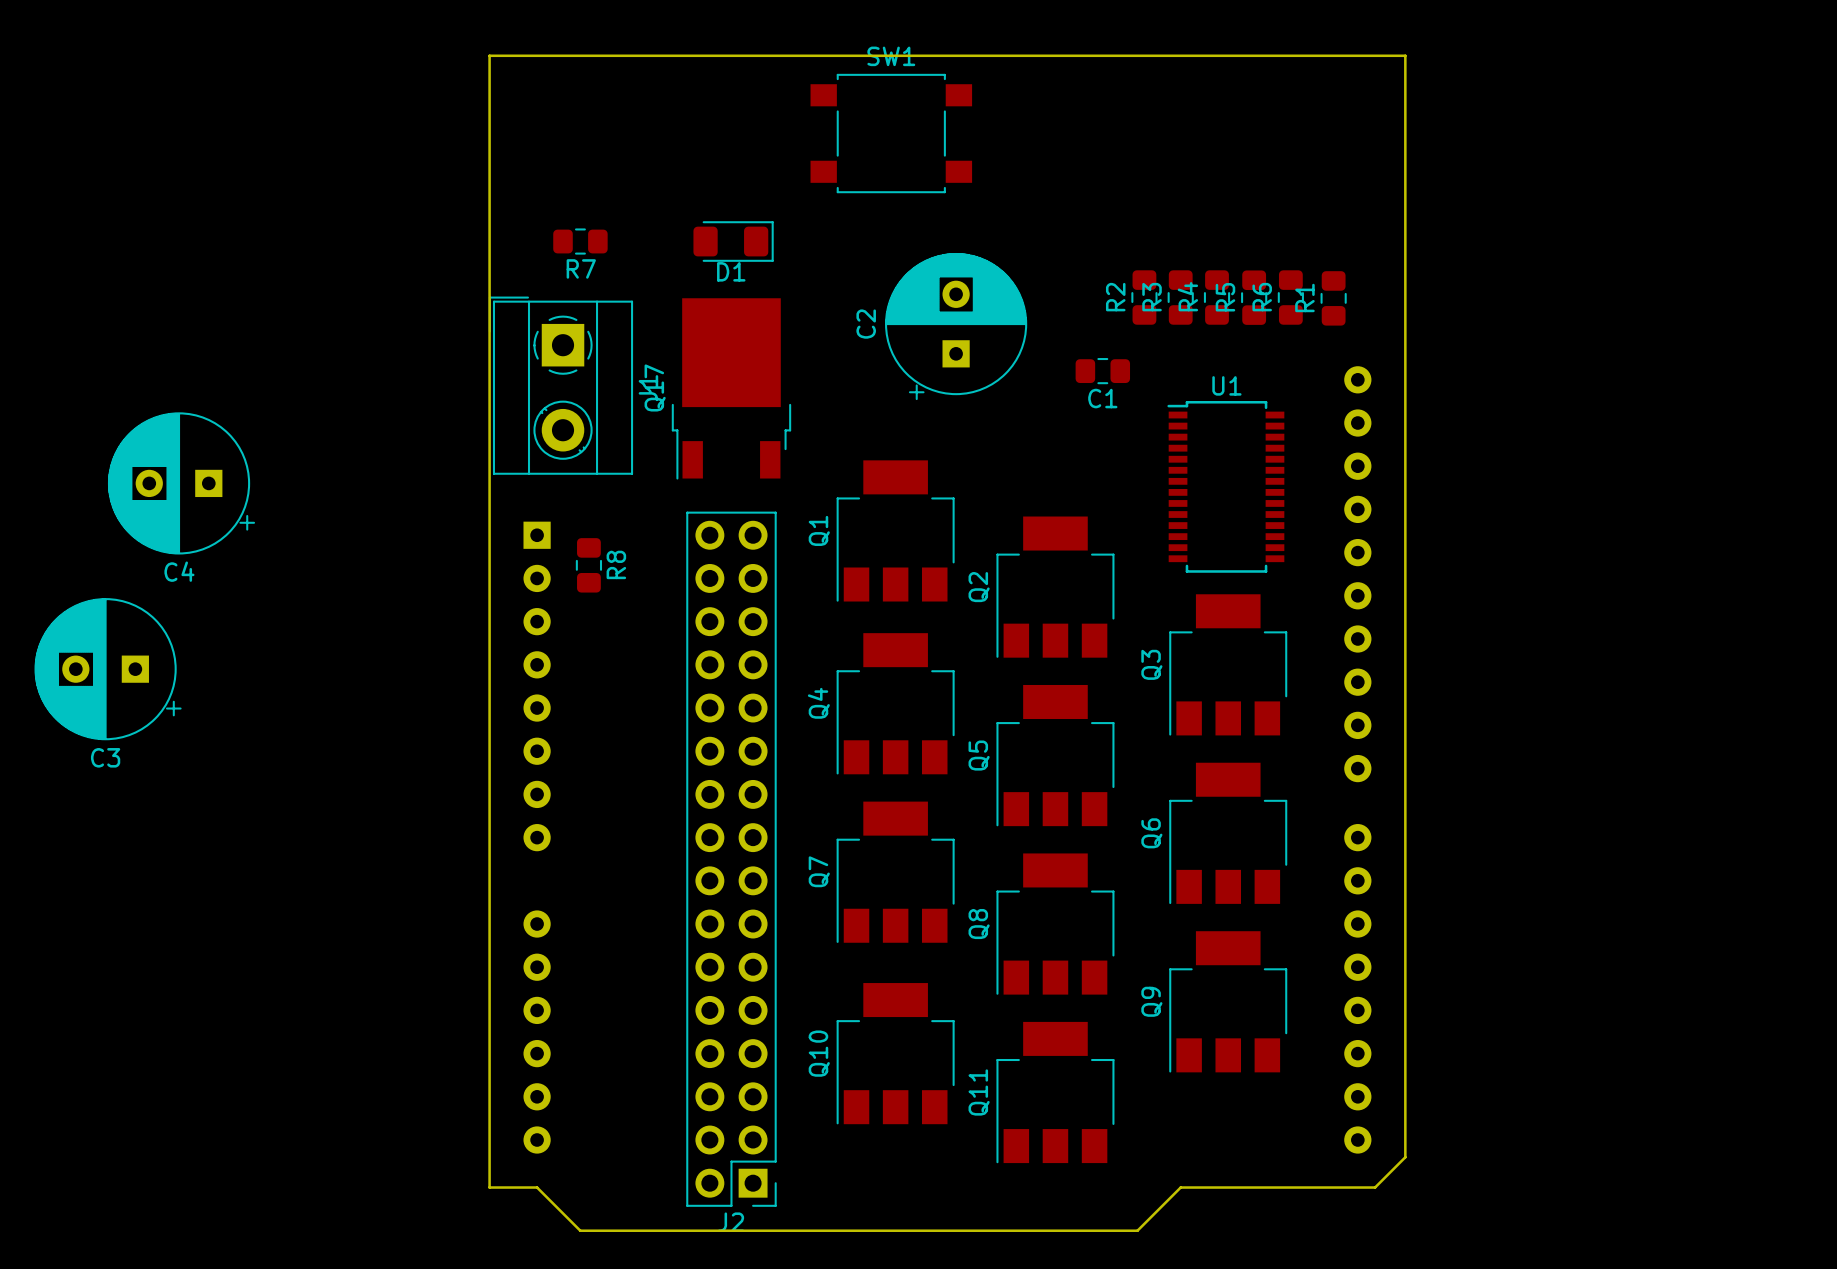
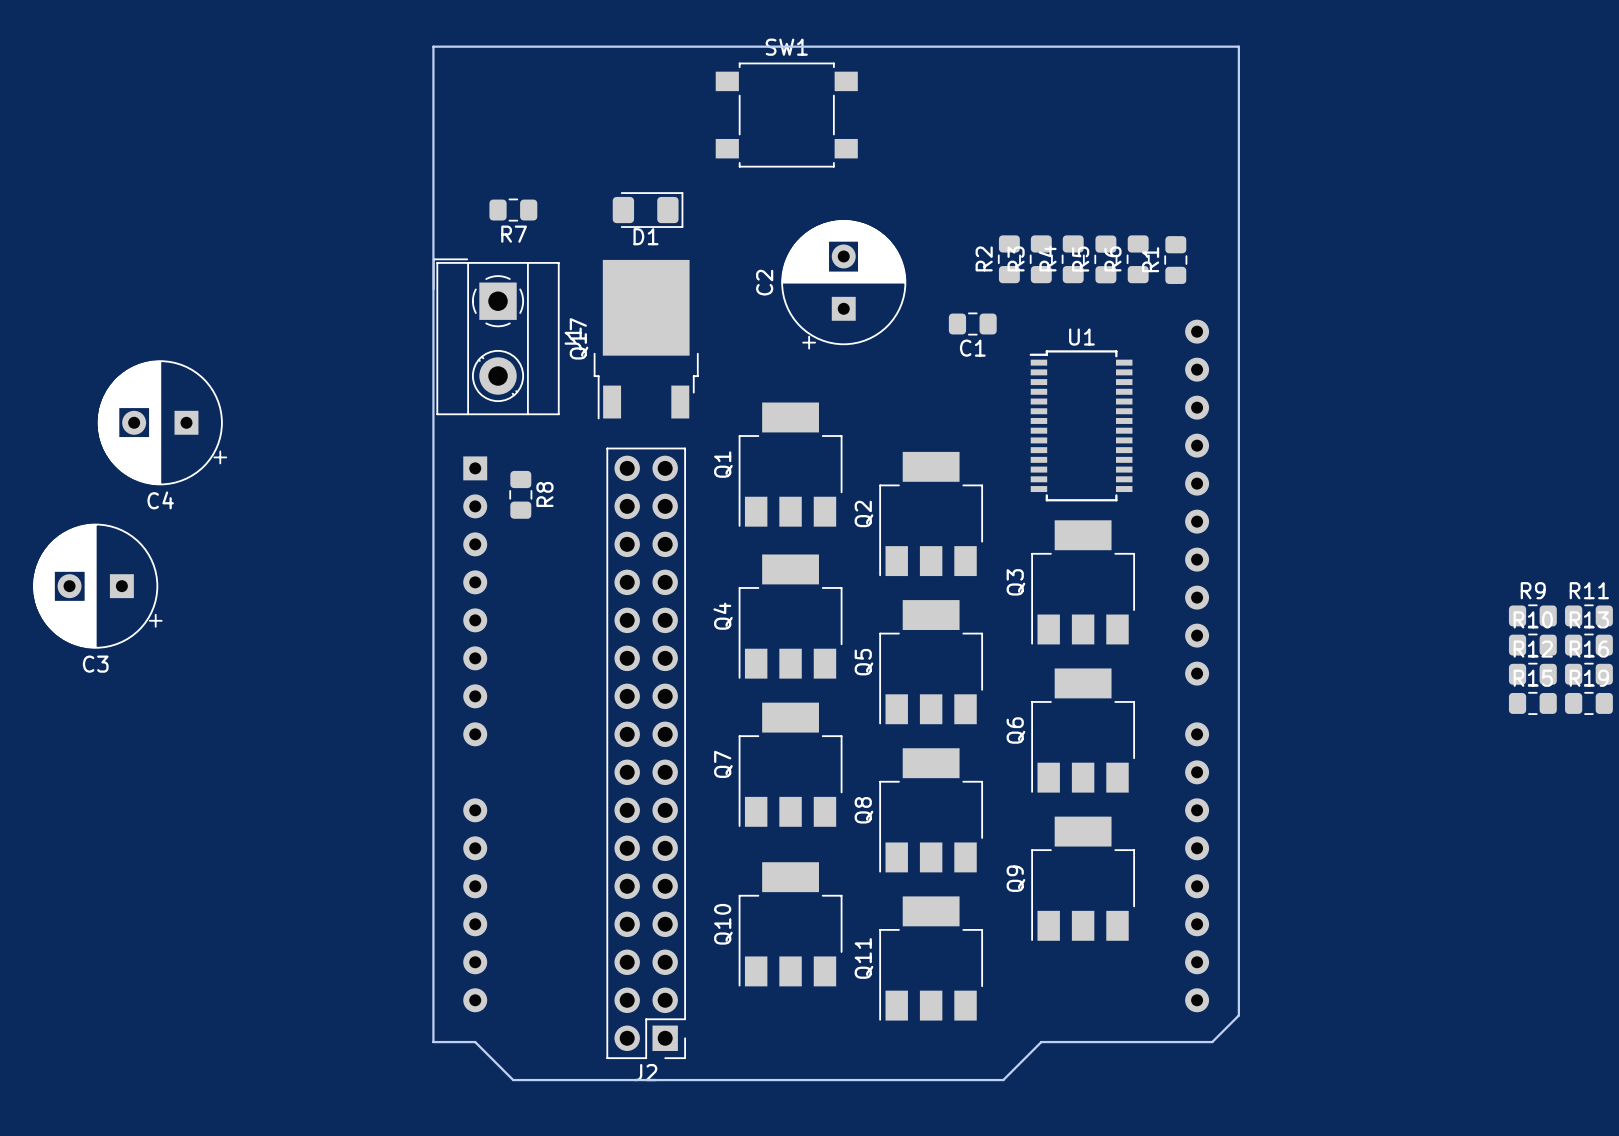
R9: none -> (1532, 615)
R11: none -> (1588, 615)
part: none -> (1532, 645)
part: none -> (1588, 645)
part: none -> (1532, 674)
part: none -> (1588, 674)
part: none -> (1532, 703)
part: none -> (1588, 703)

